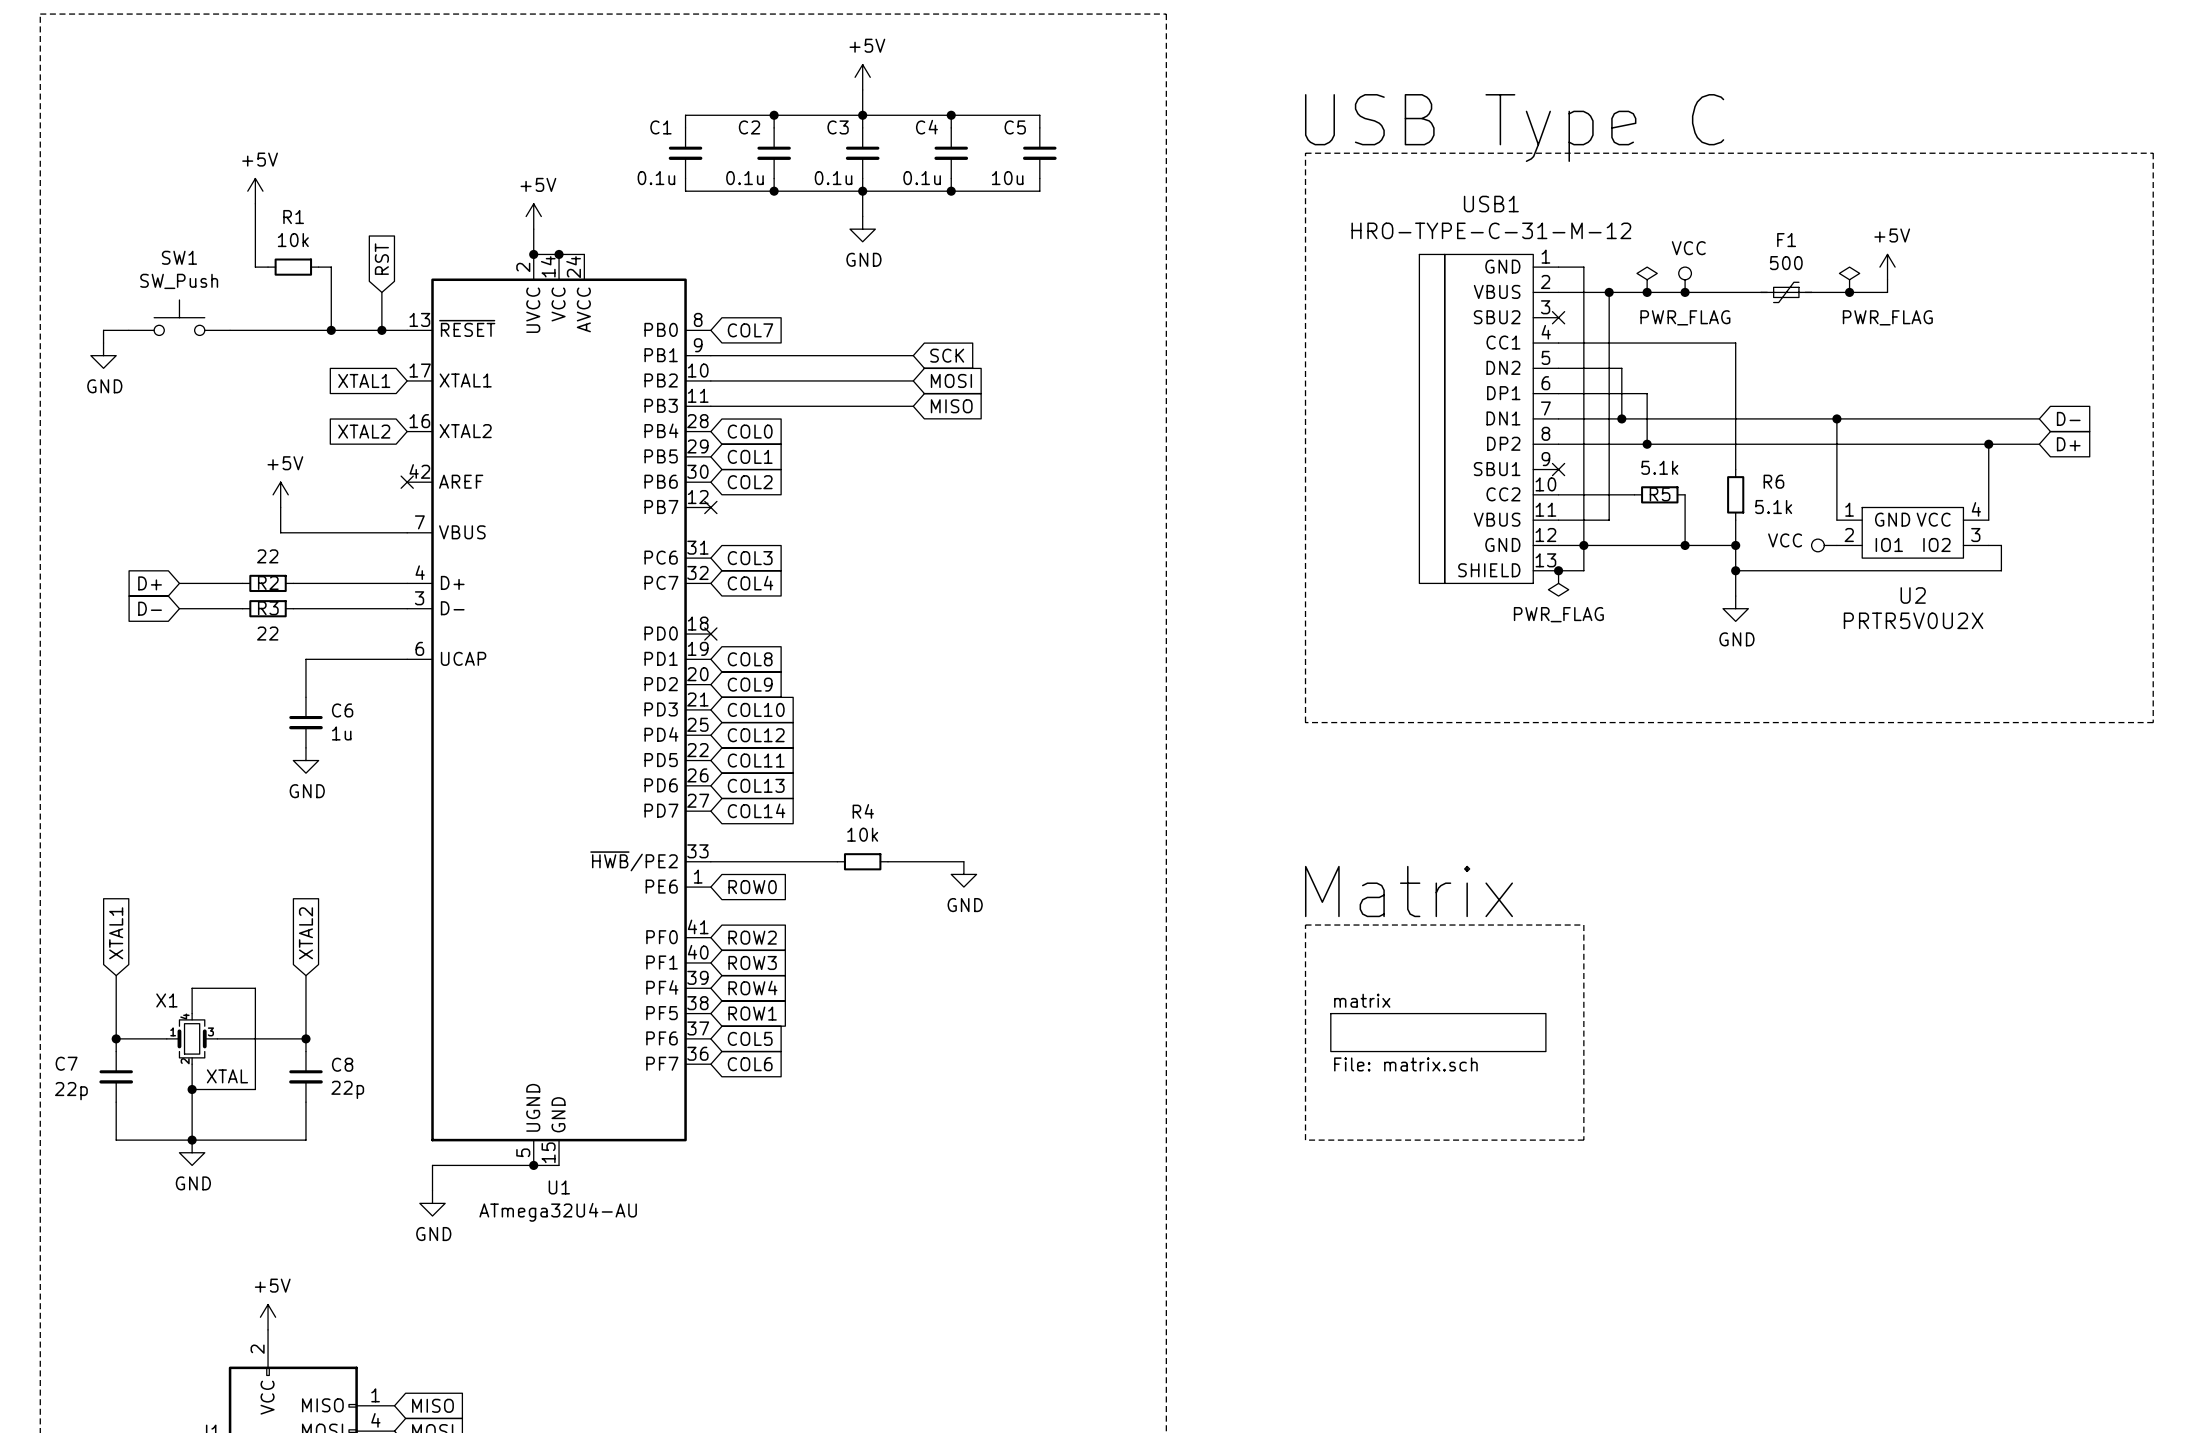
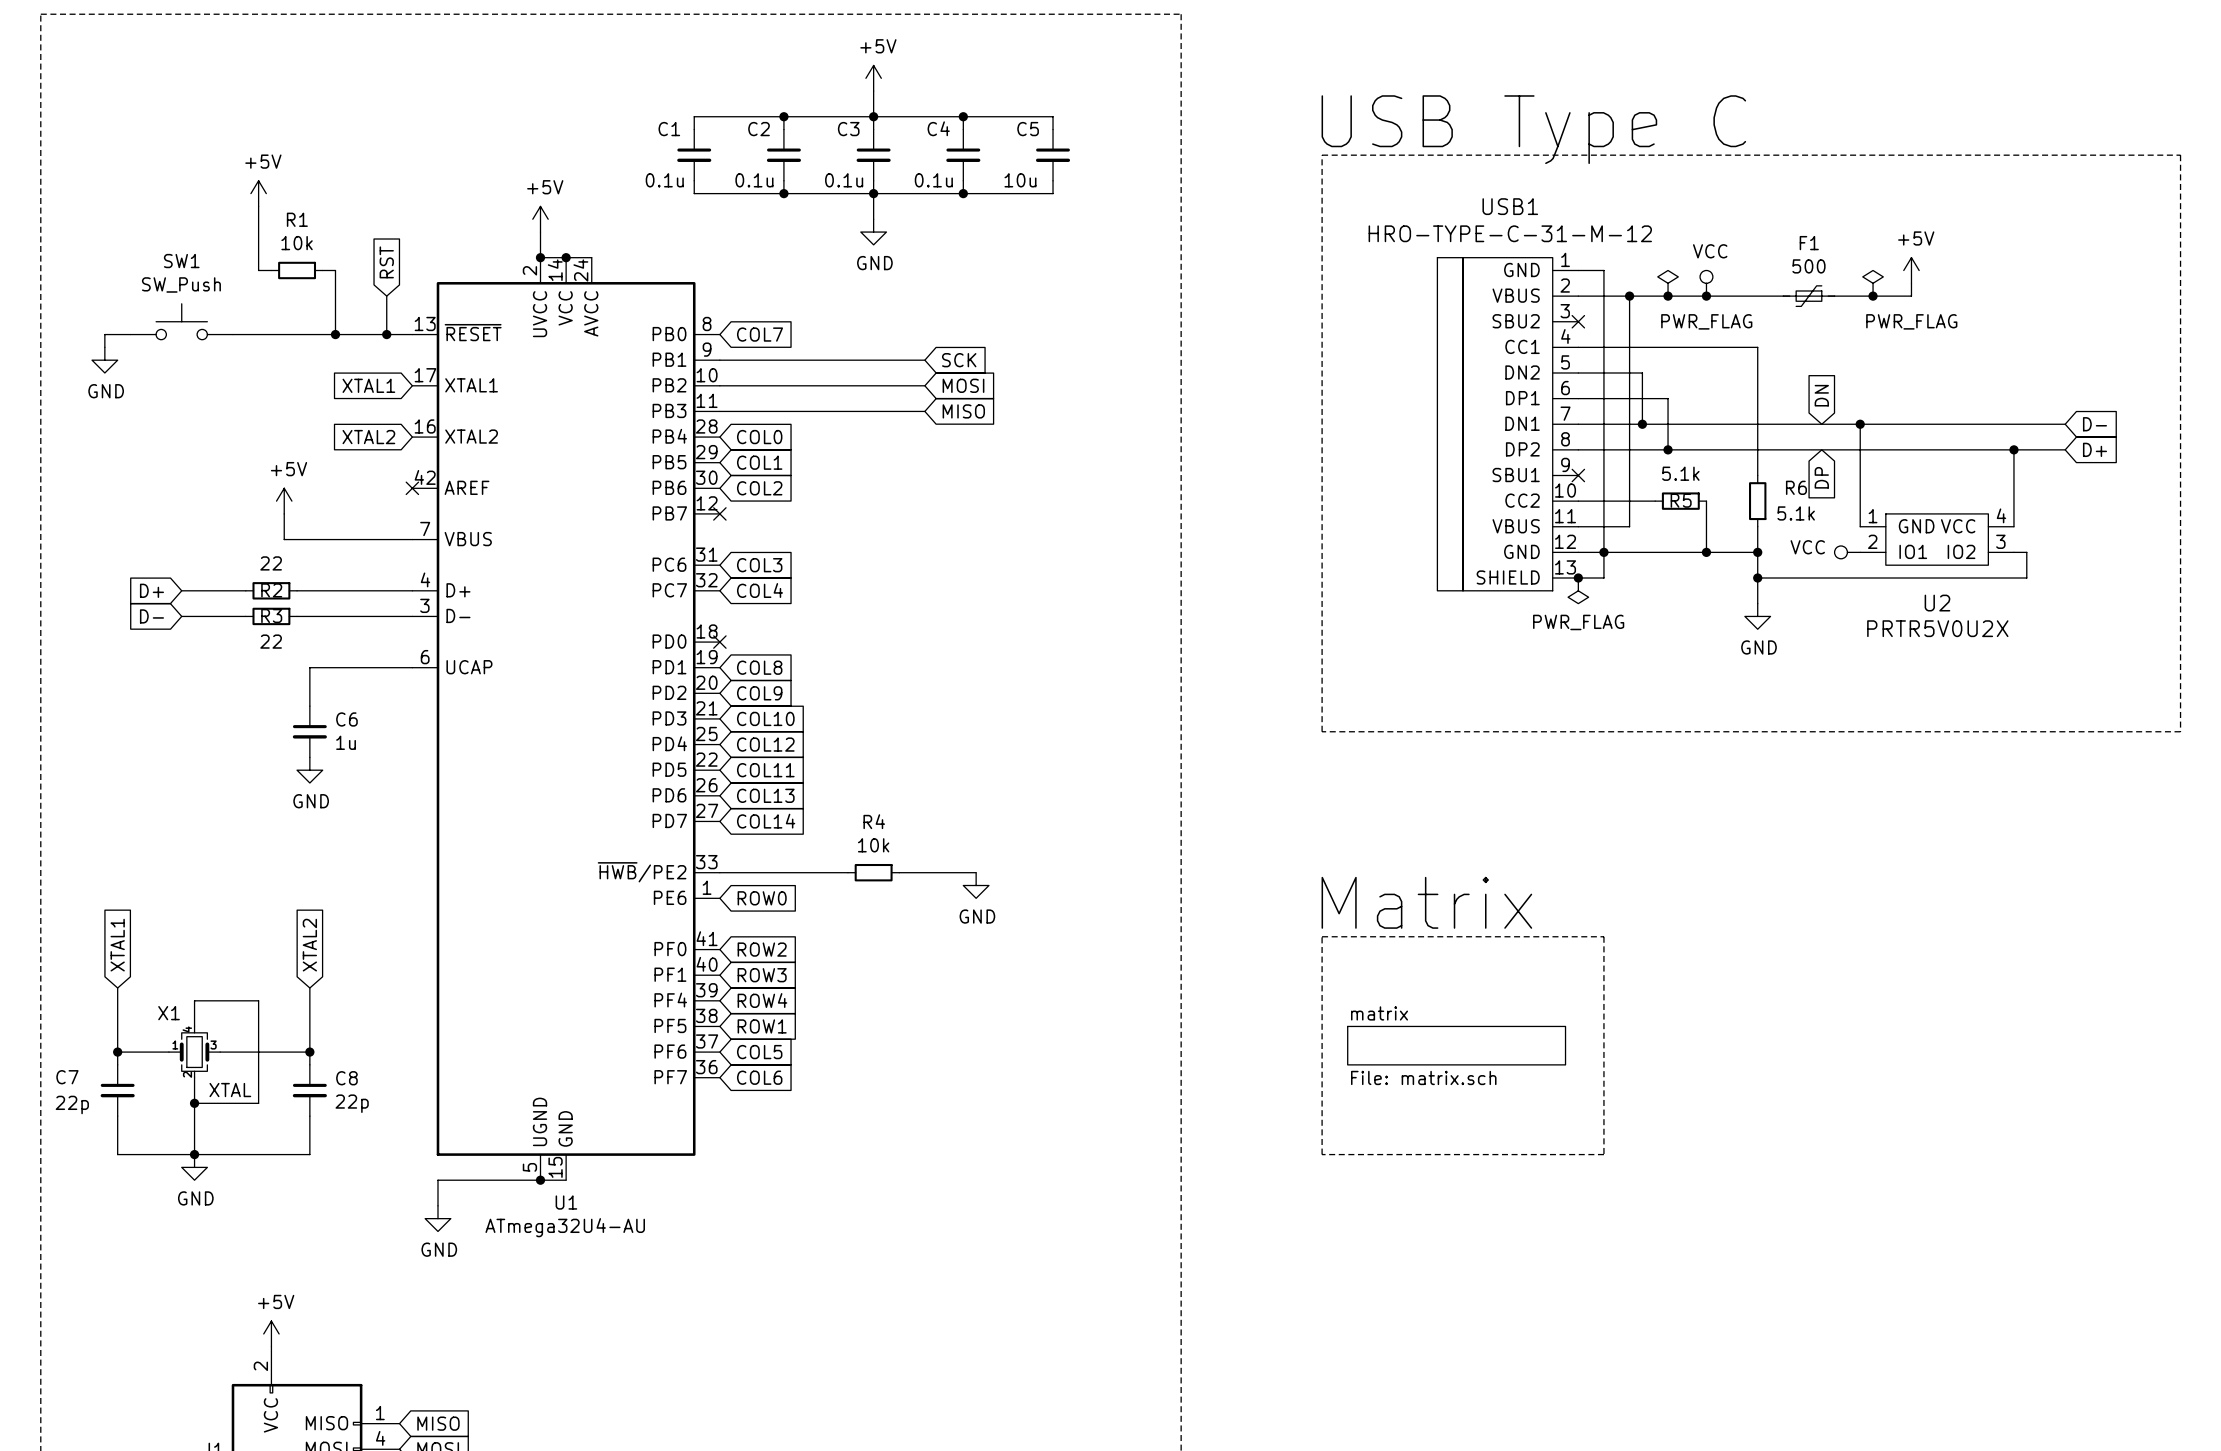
global label: none -> DN (1821, 395)
global label: none -> DP (1821, 477)

